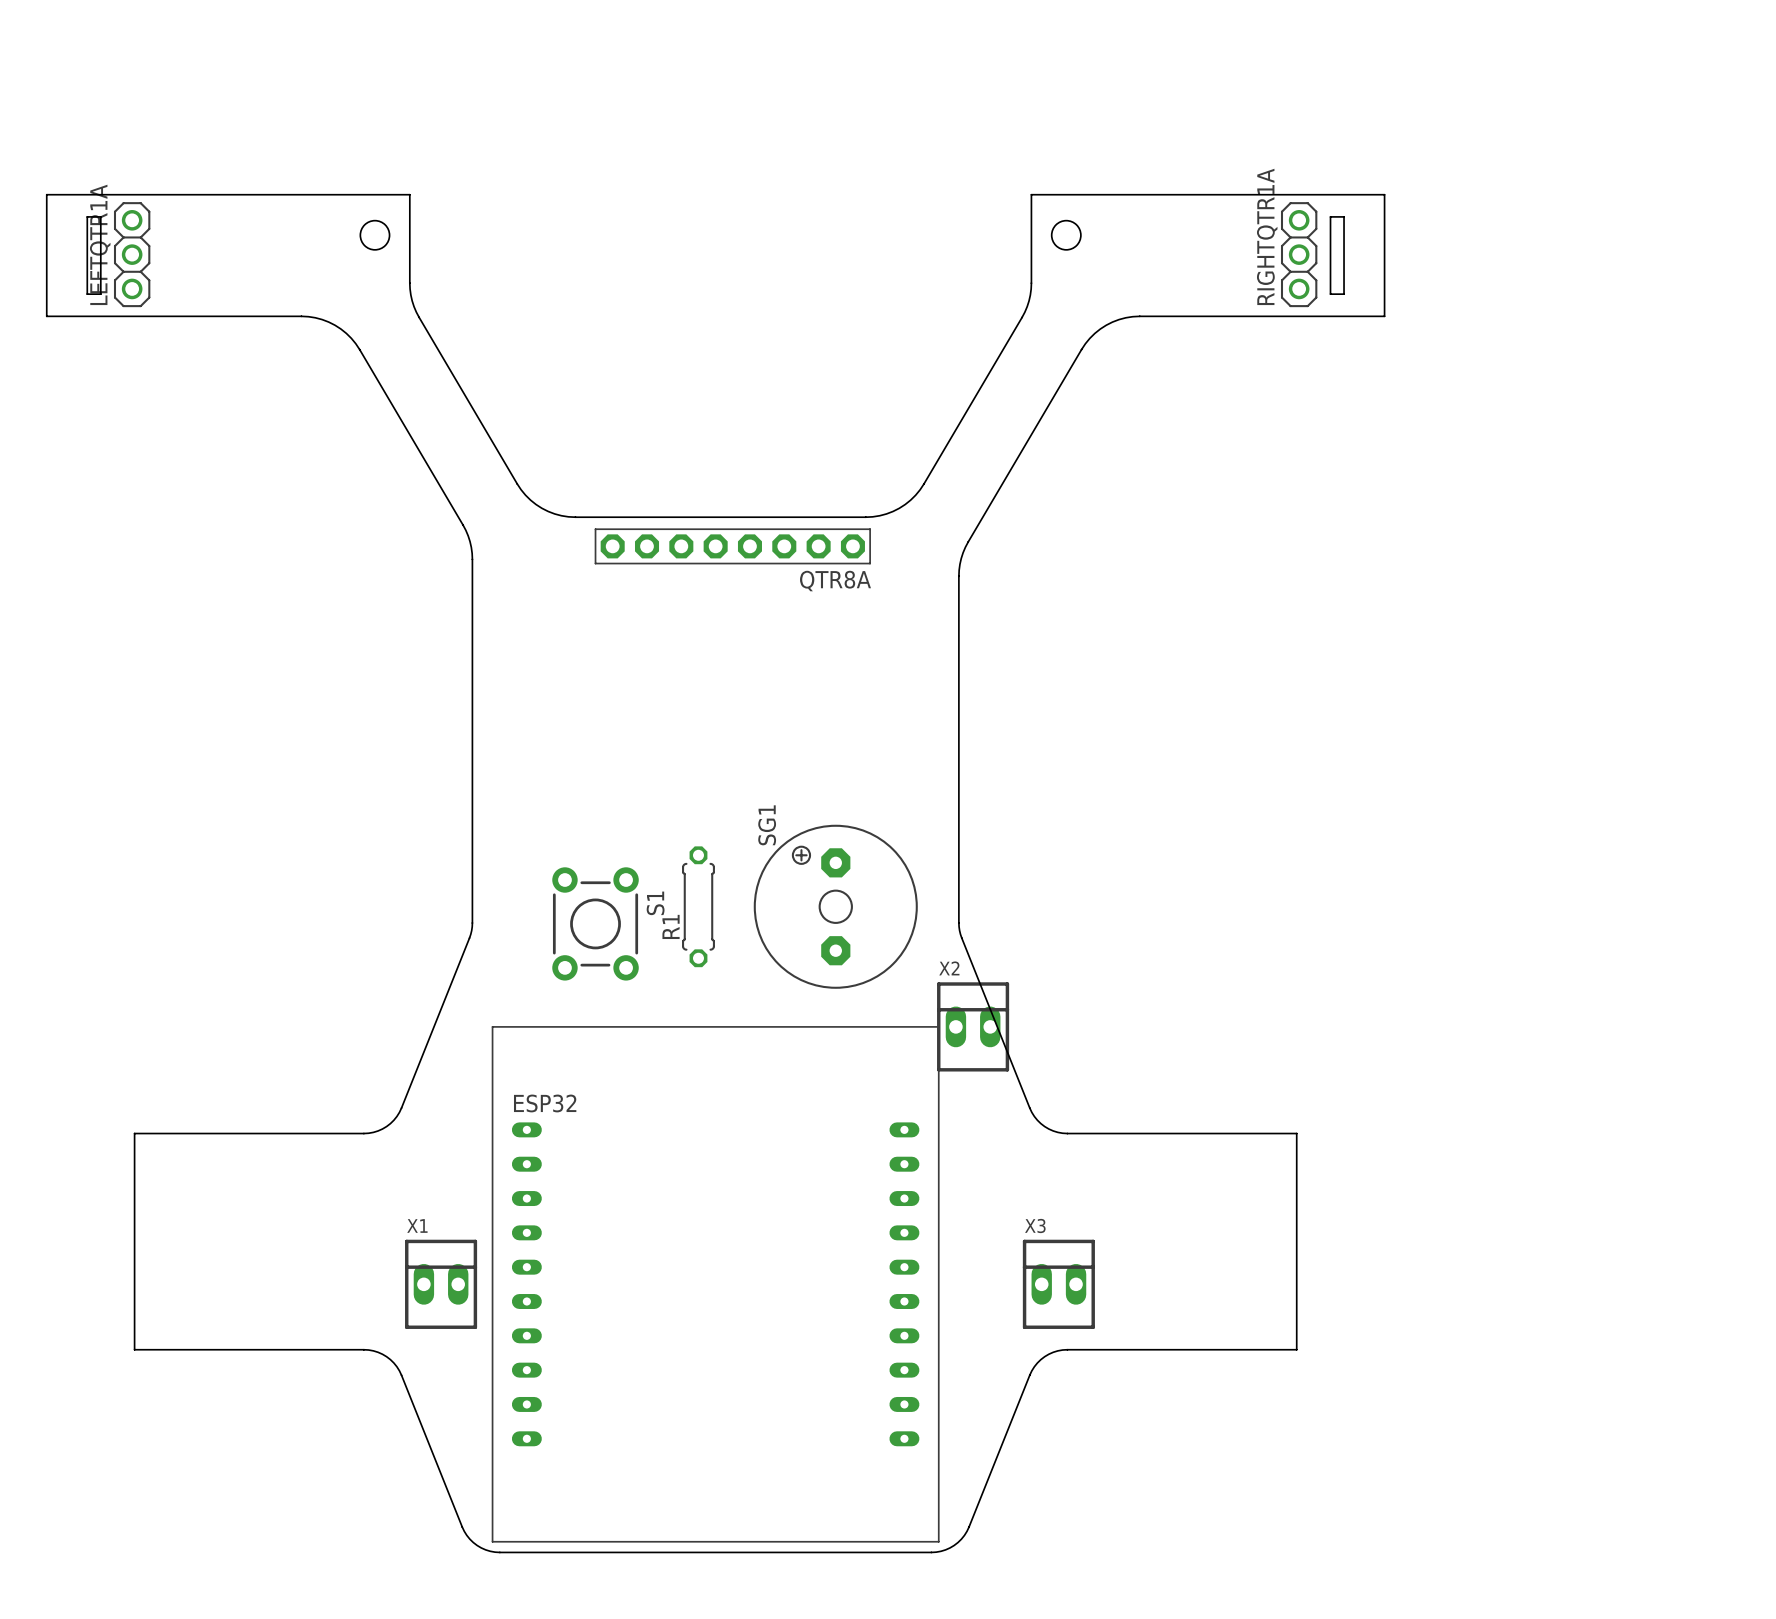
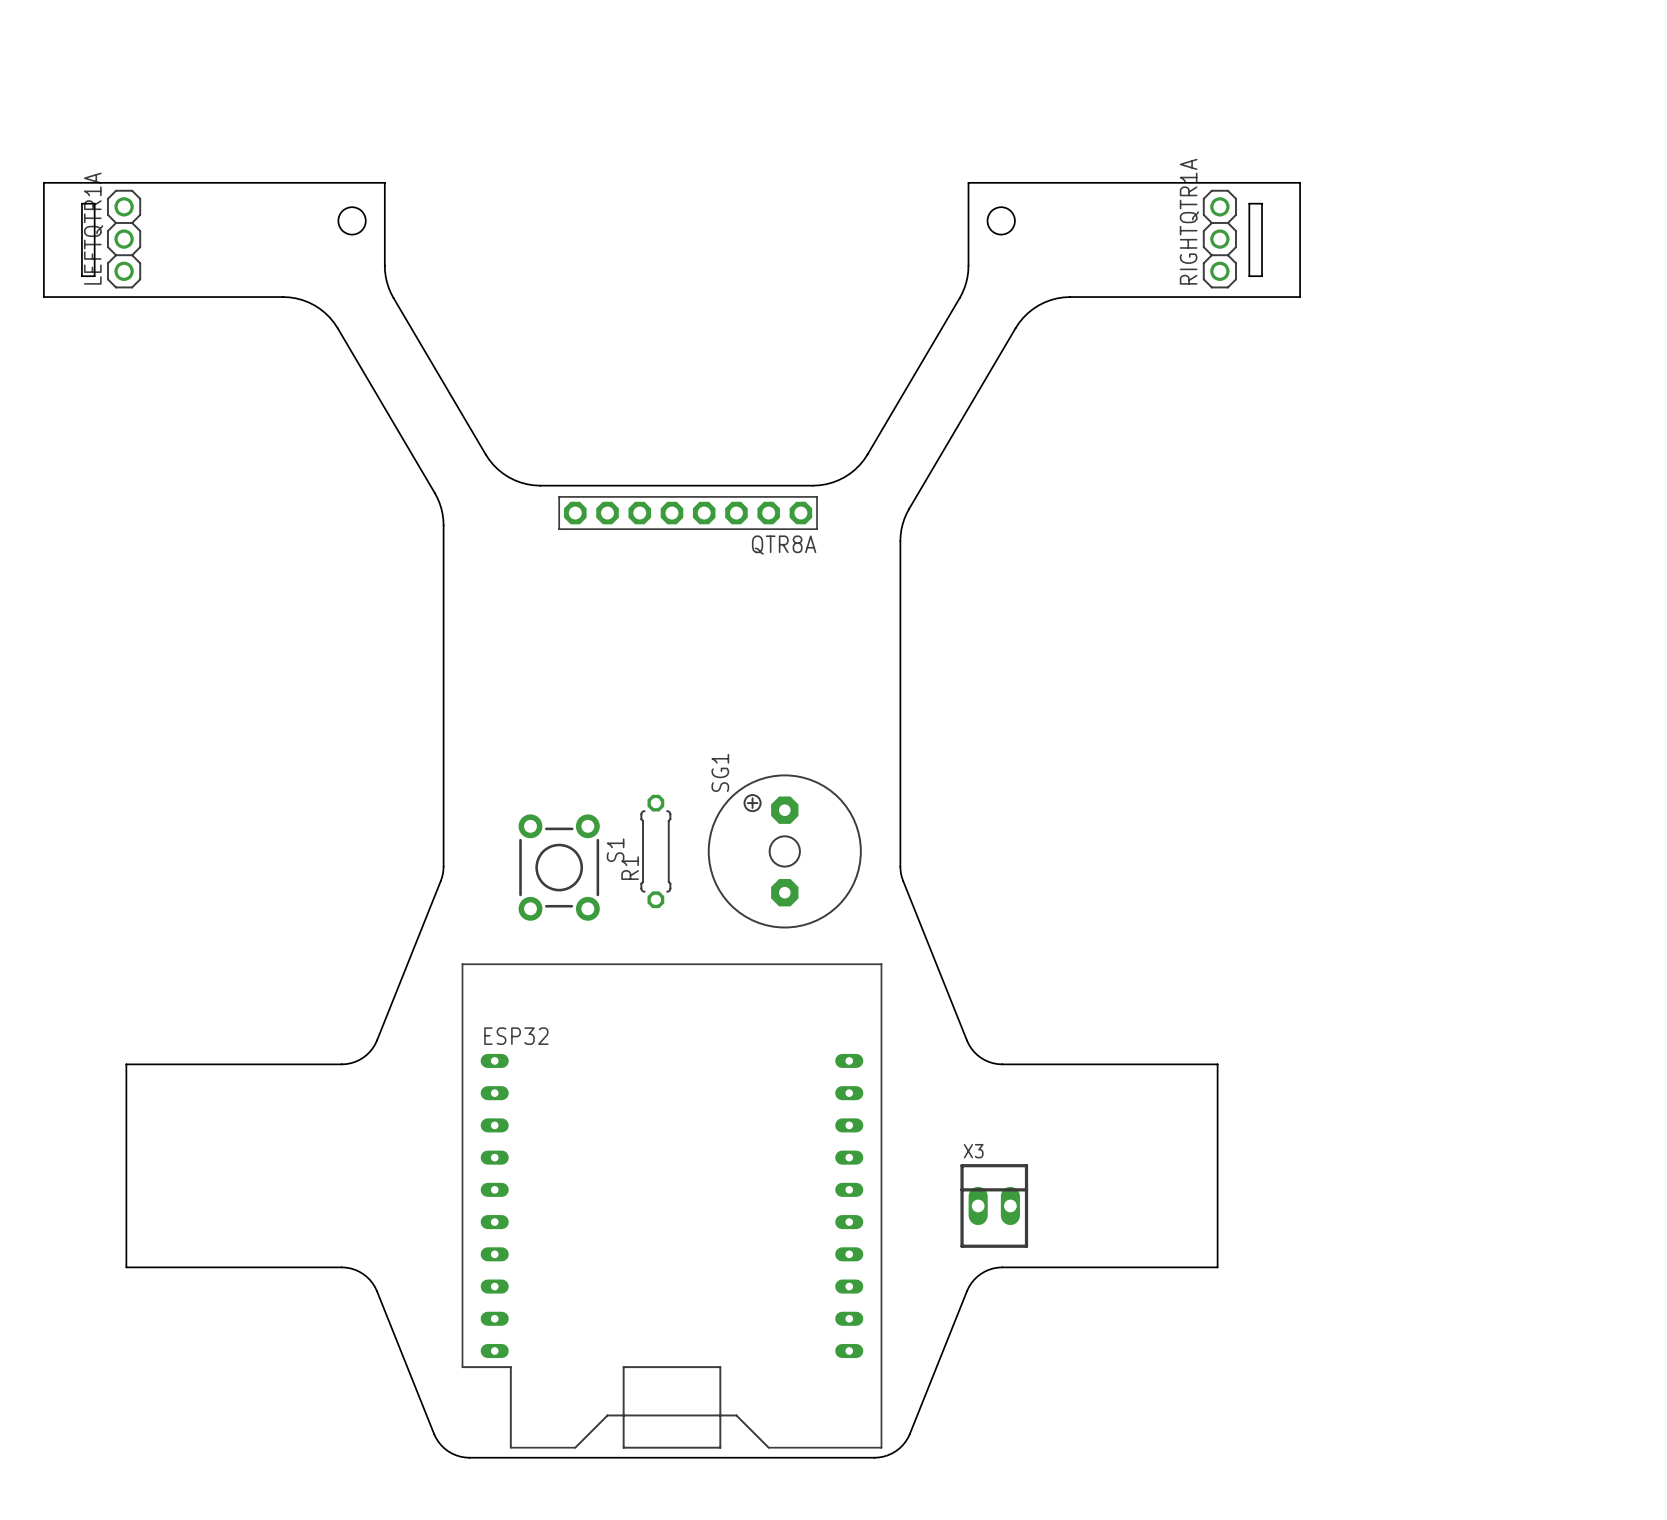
ESP32 footprint: [491, 1026, 940, 1543] -> [461, 963, 883, 1449]
X2: (973, 1026) -> none
X1: (441, 1284) -> none

